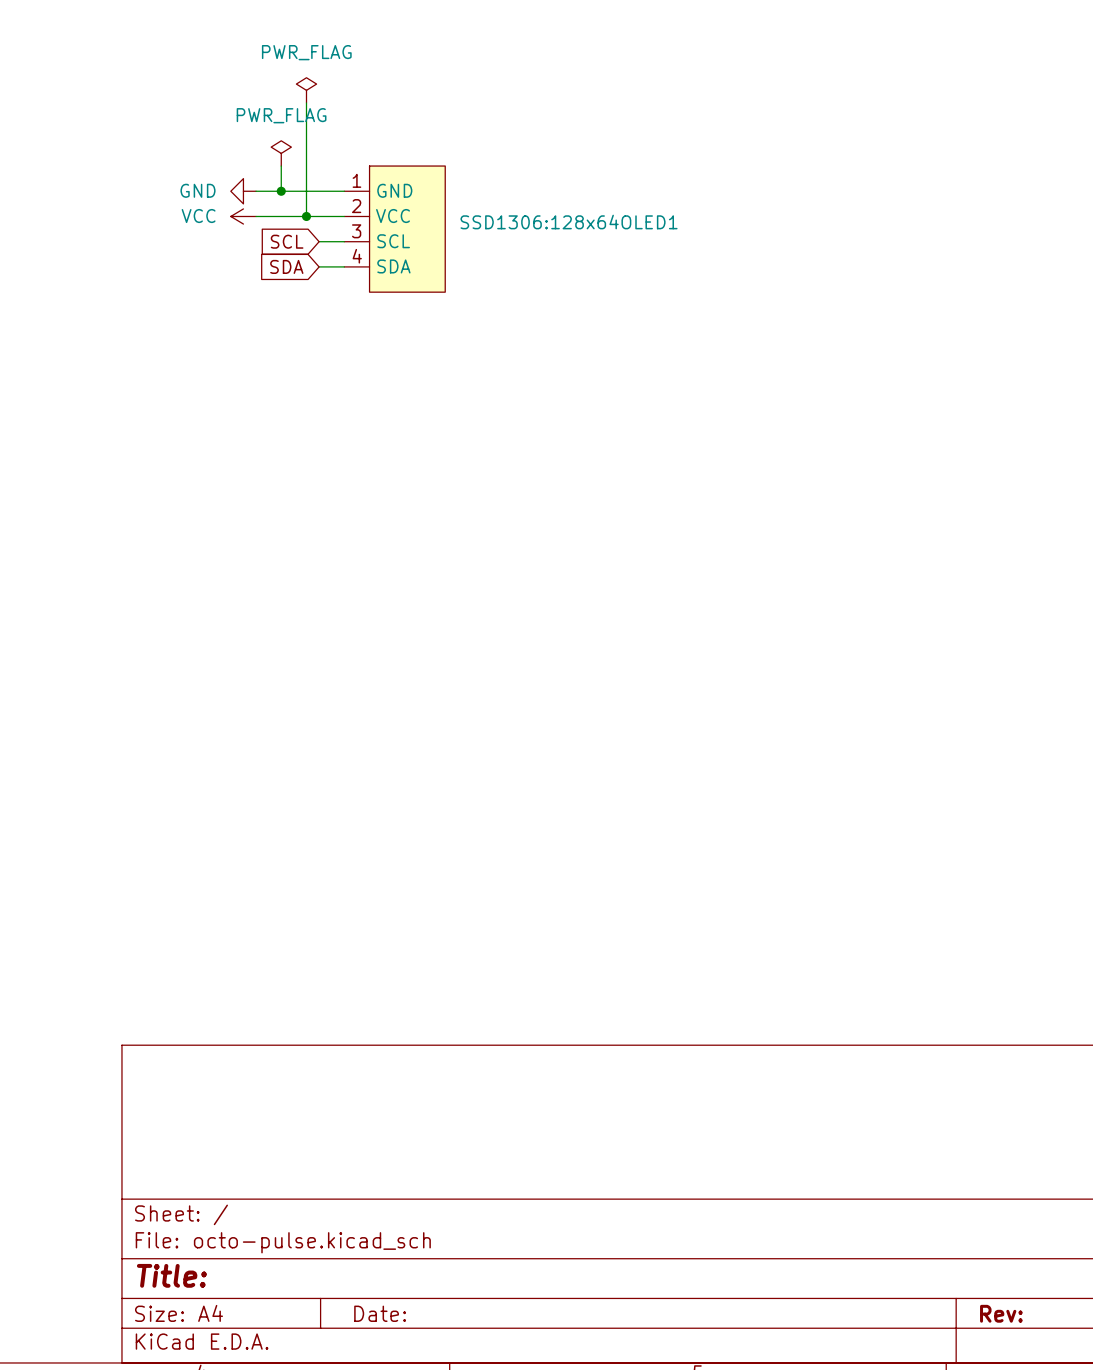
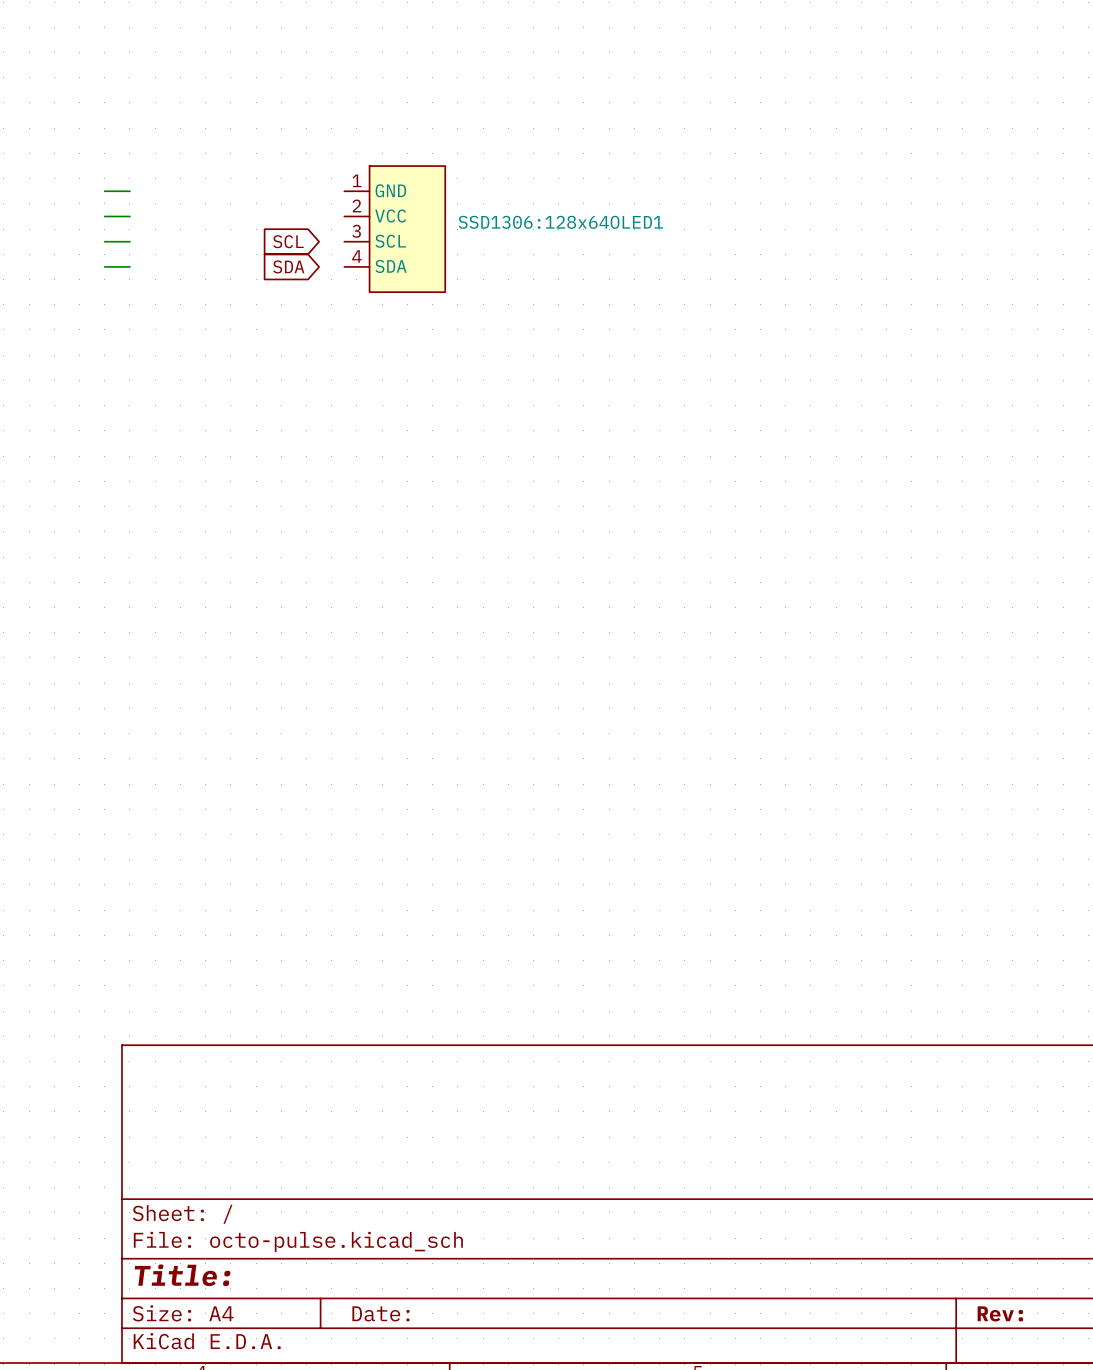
power symbol: PWR_FLAG (306, 90) -> none
wire: (306, 102) (306, 216) -> none
power symbol: PWR_FLAG (281, 153) -> none
wire: (281, 166) (281, 191) -> none
wire: none -> (104, 191) (129, 191)
power symbol: GND (243, 191) -> none
wire: (256, 191) (344, 191) -> none
junction: (281, 191) -> none
wire: none -> (104, 216) (129, 216)
power symbol: VCC (243, 216) -> none
wire: (256, 216) (344, 216) -> none
junction: (306, 216) -> none
wire: (319, 241) (344, 241) -> (104, 241) (129, 241)
wire: (319, 266) (344, 266) -> (104, 266) (129, 266)

